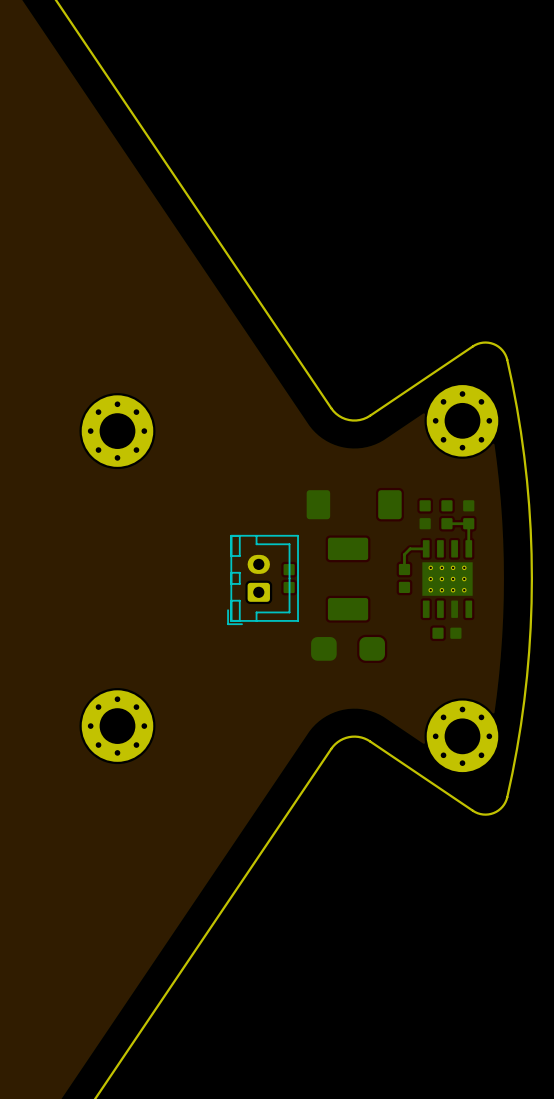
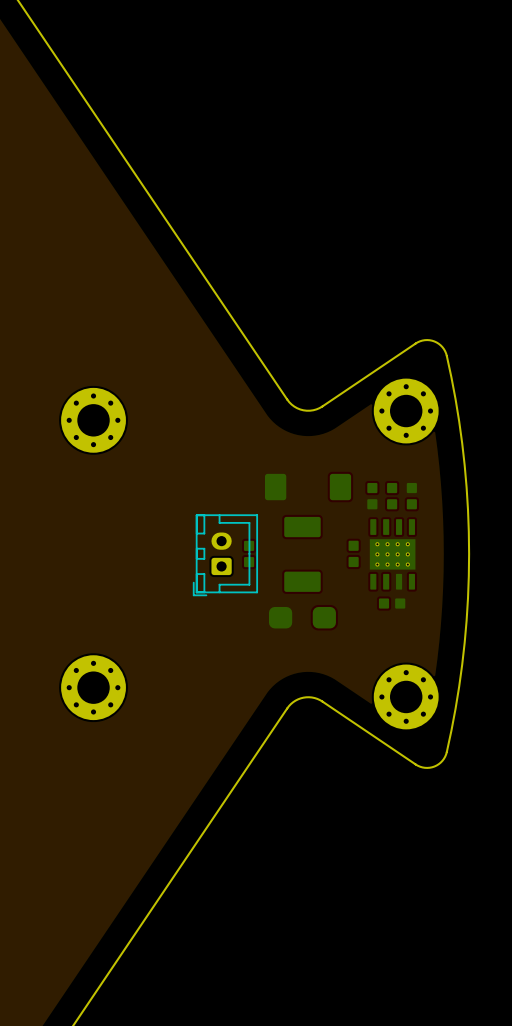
bottom track: (446, 523) (468, 523) (468, 548) -> none
bottom track: (426, 548) (410, 548) (404, 554) (404, 569) -> none

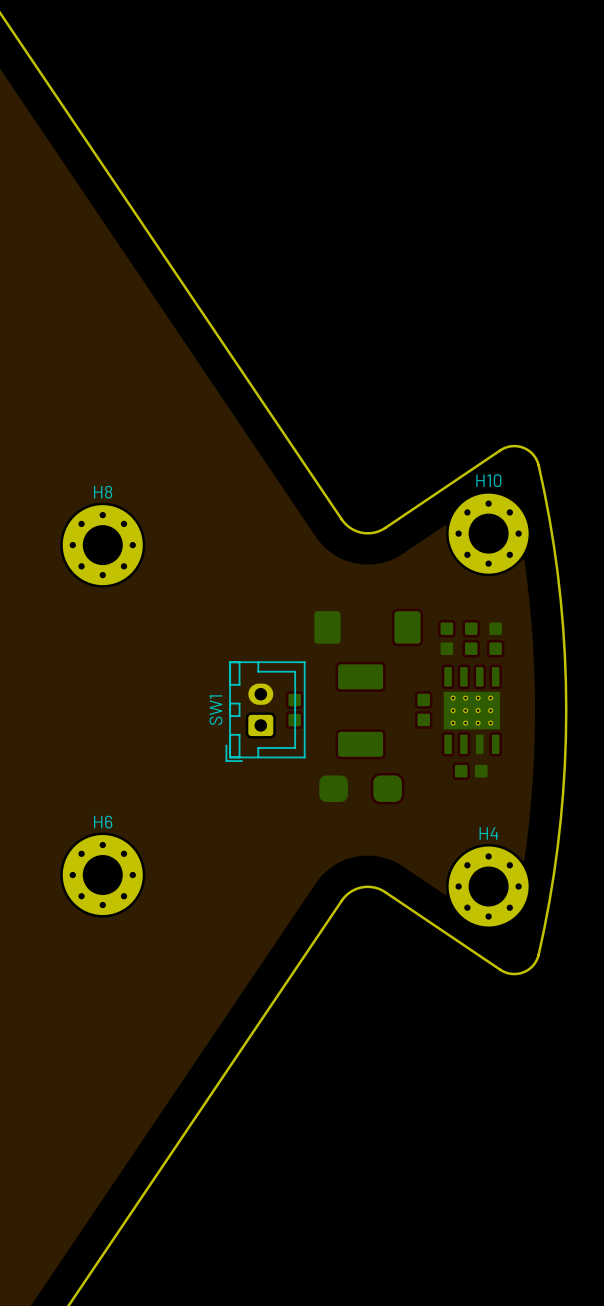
H10 name: none -> H10 (488, 480)
H8 name: none -> H8 (103, 492)
SW1 name: none -> SW1 (215, 710)
H6 name: none -> H6 (103, 822)
H4 name: none -> H4 (488, 833)

